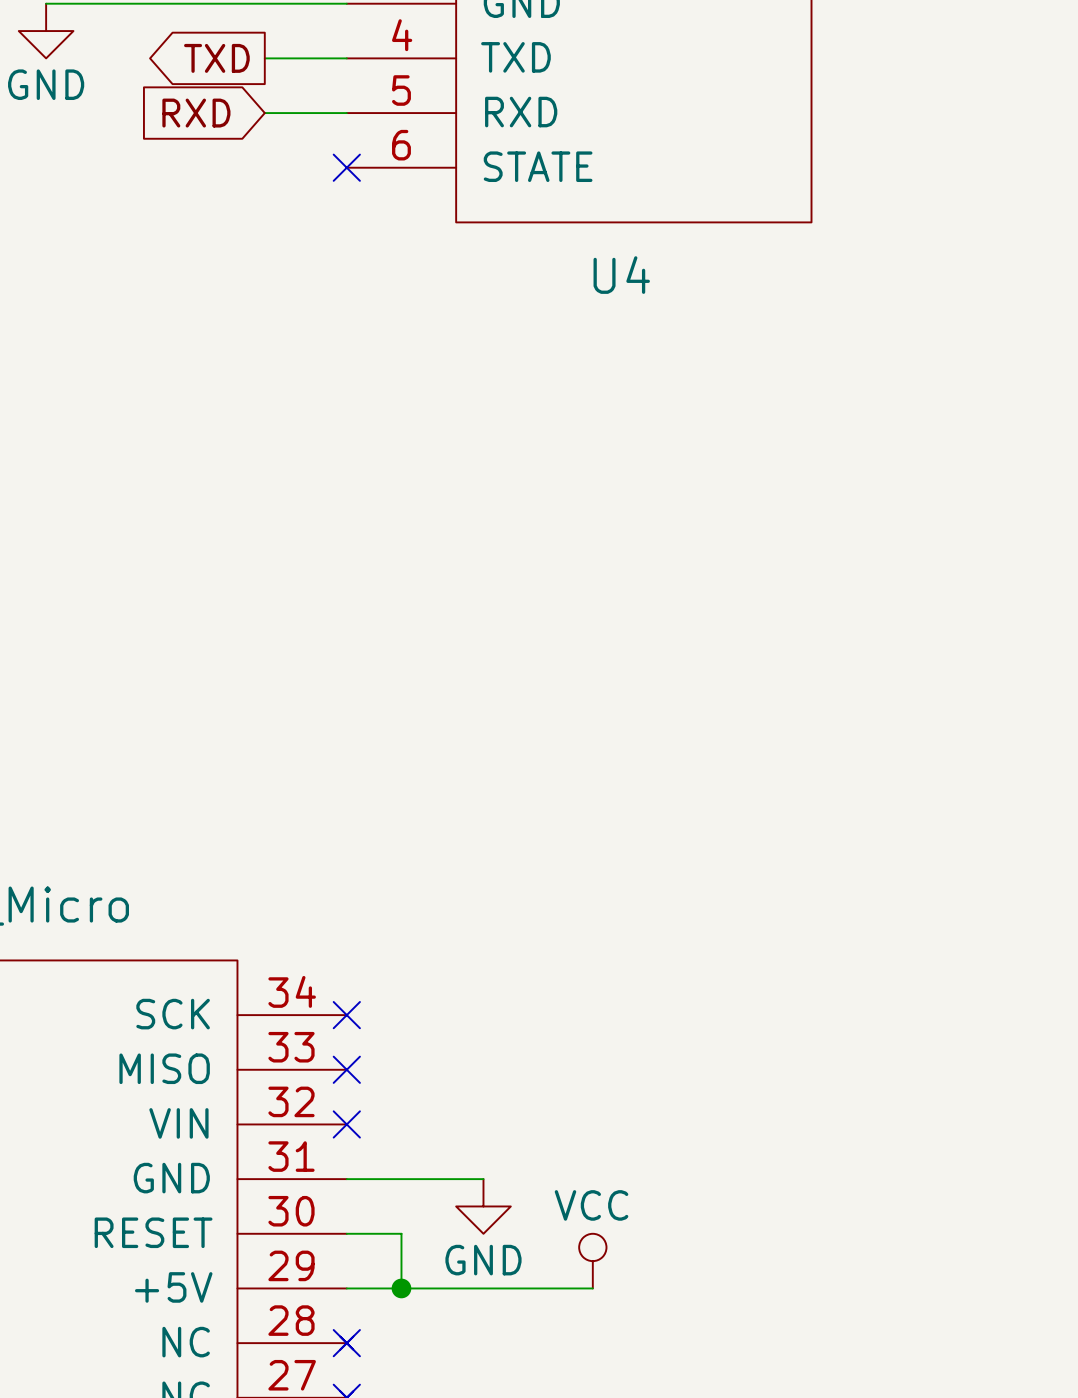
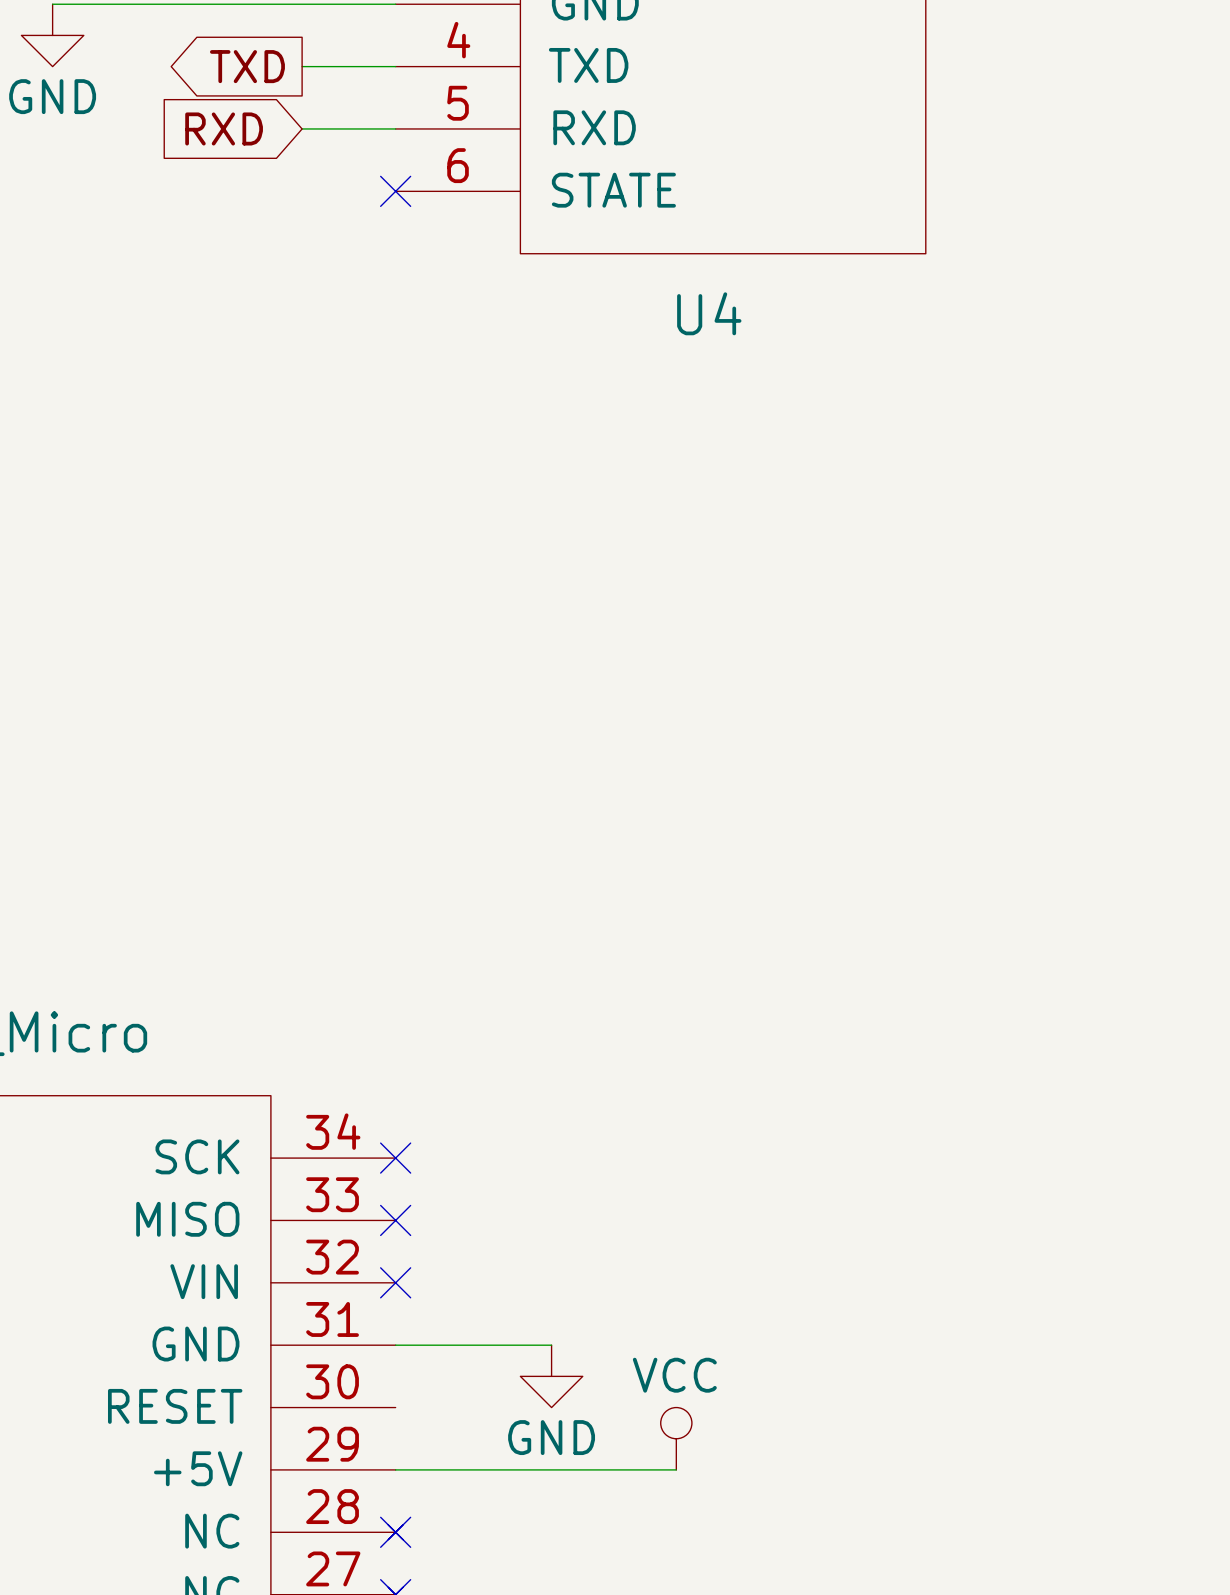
wire: (346, 1233) (401, 1233) (401, 1288) -> none
junction: (401, 1288) -> none

